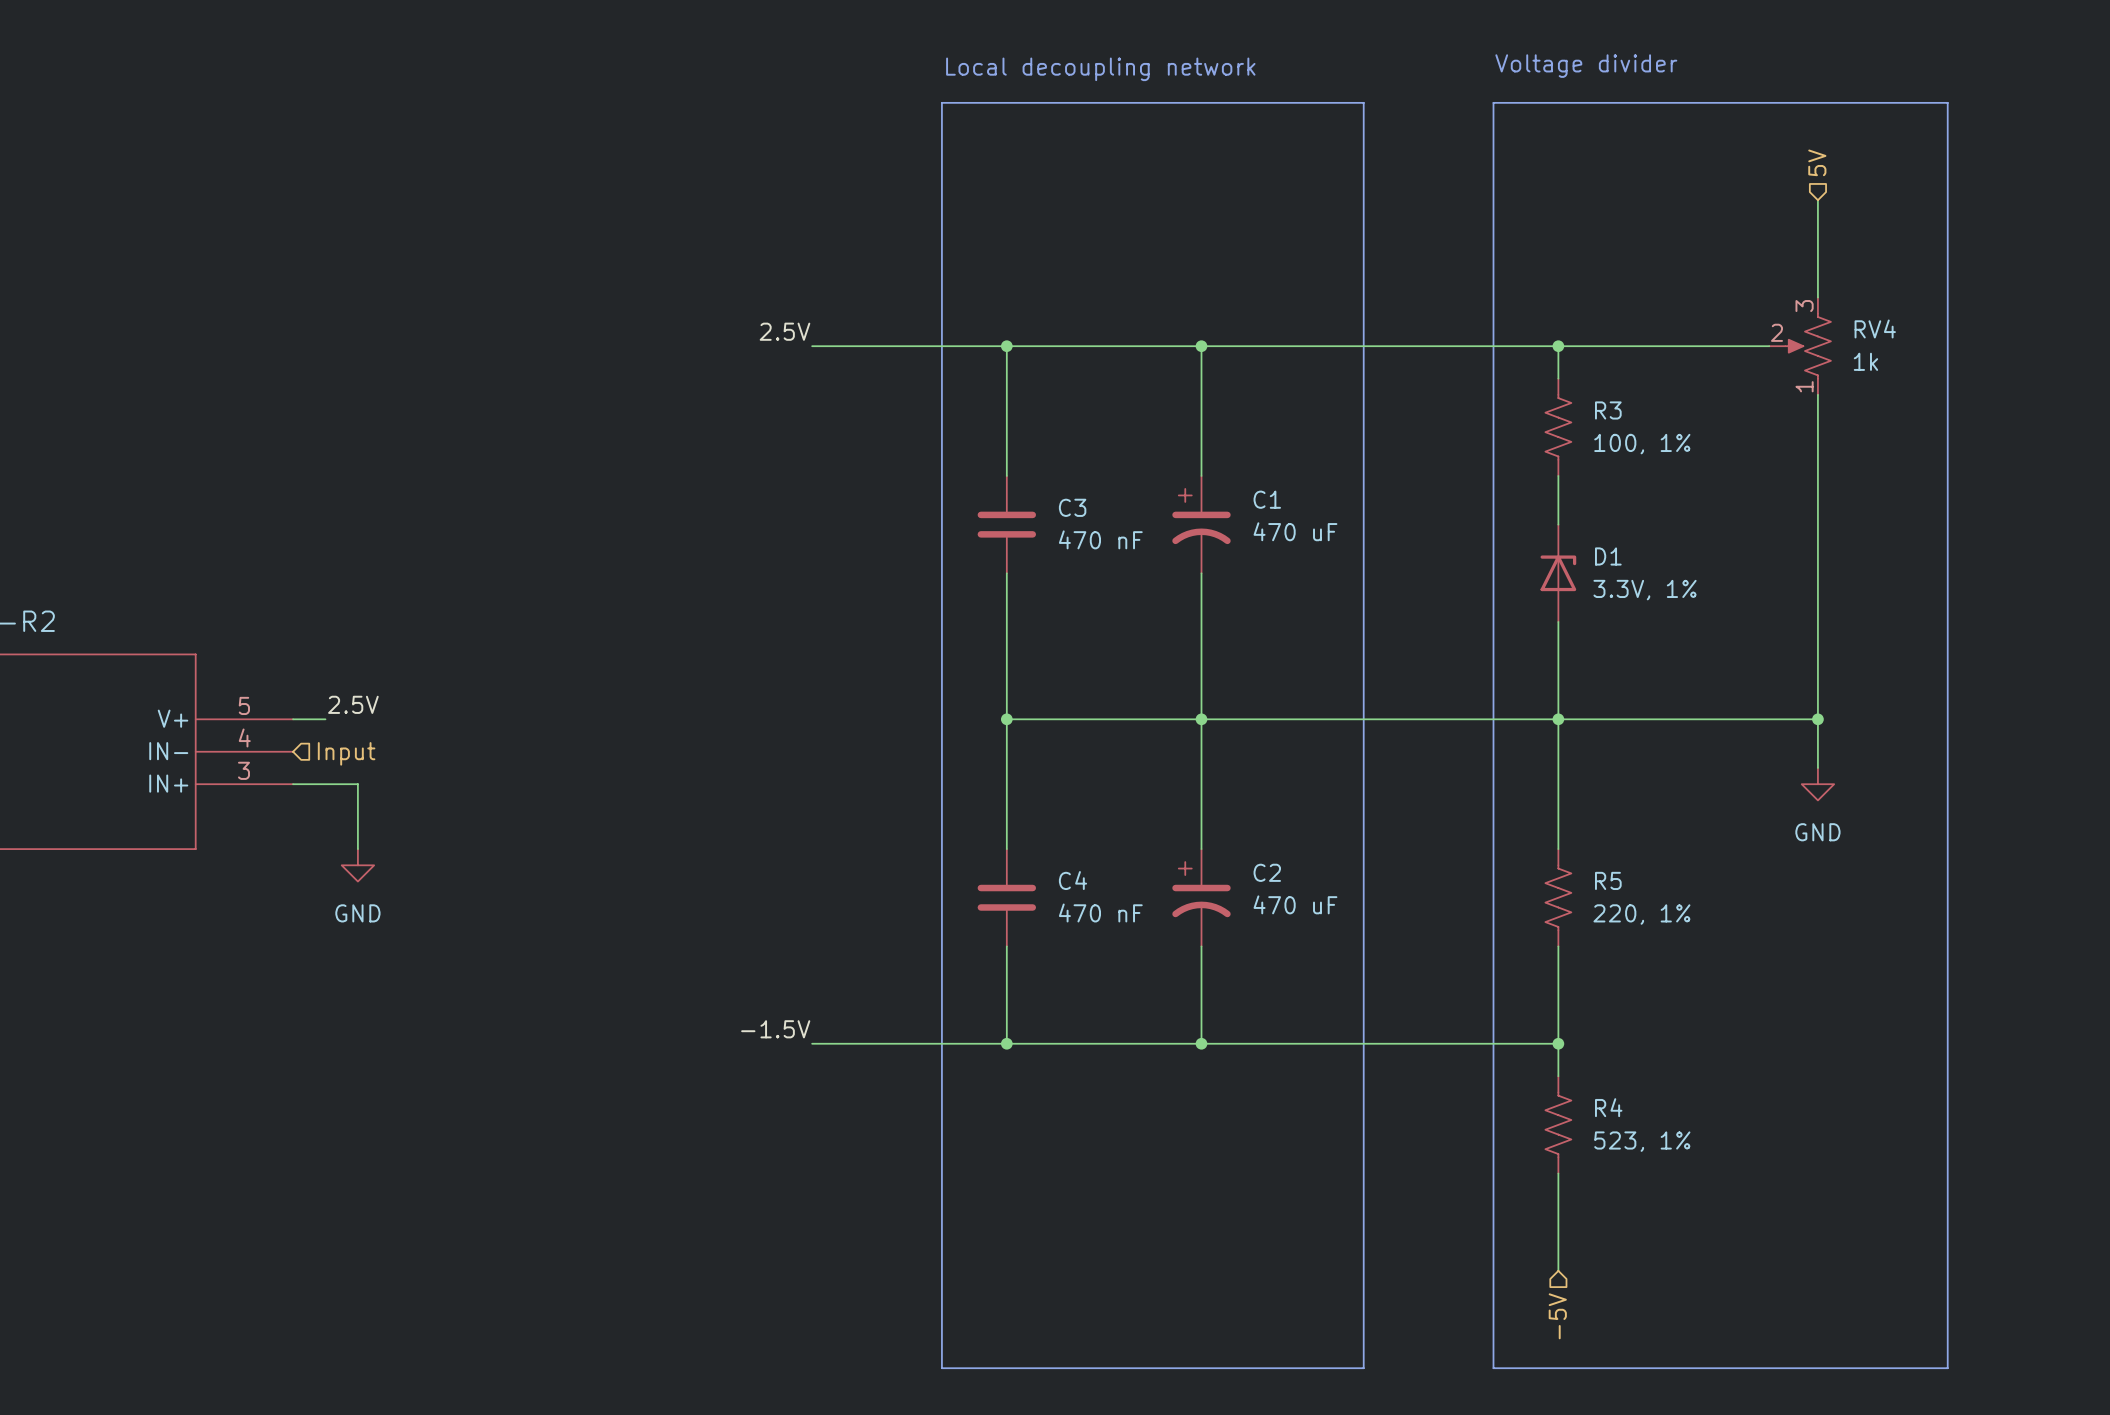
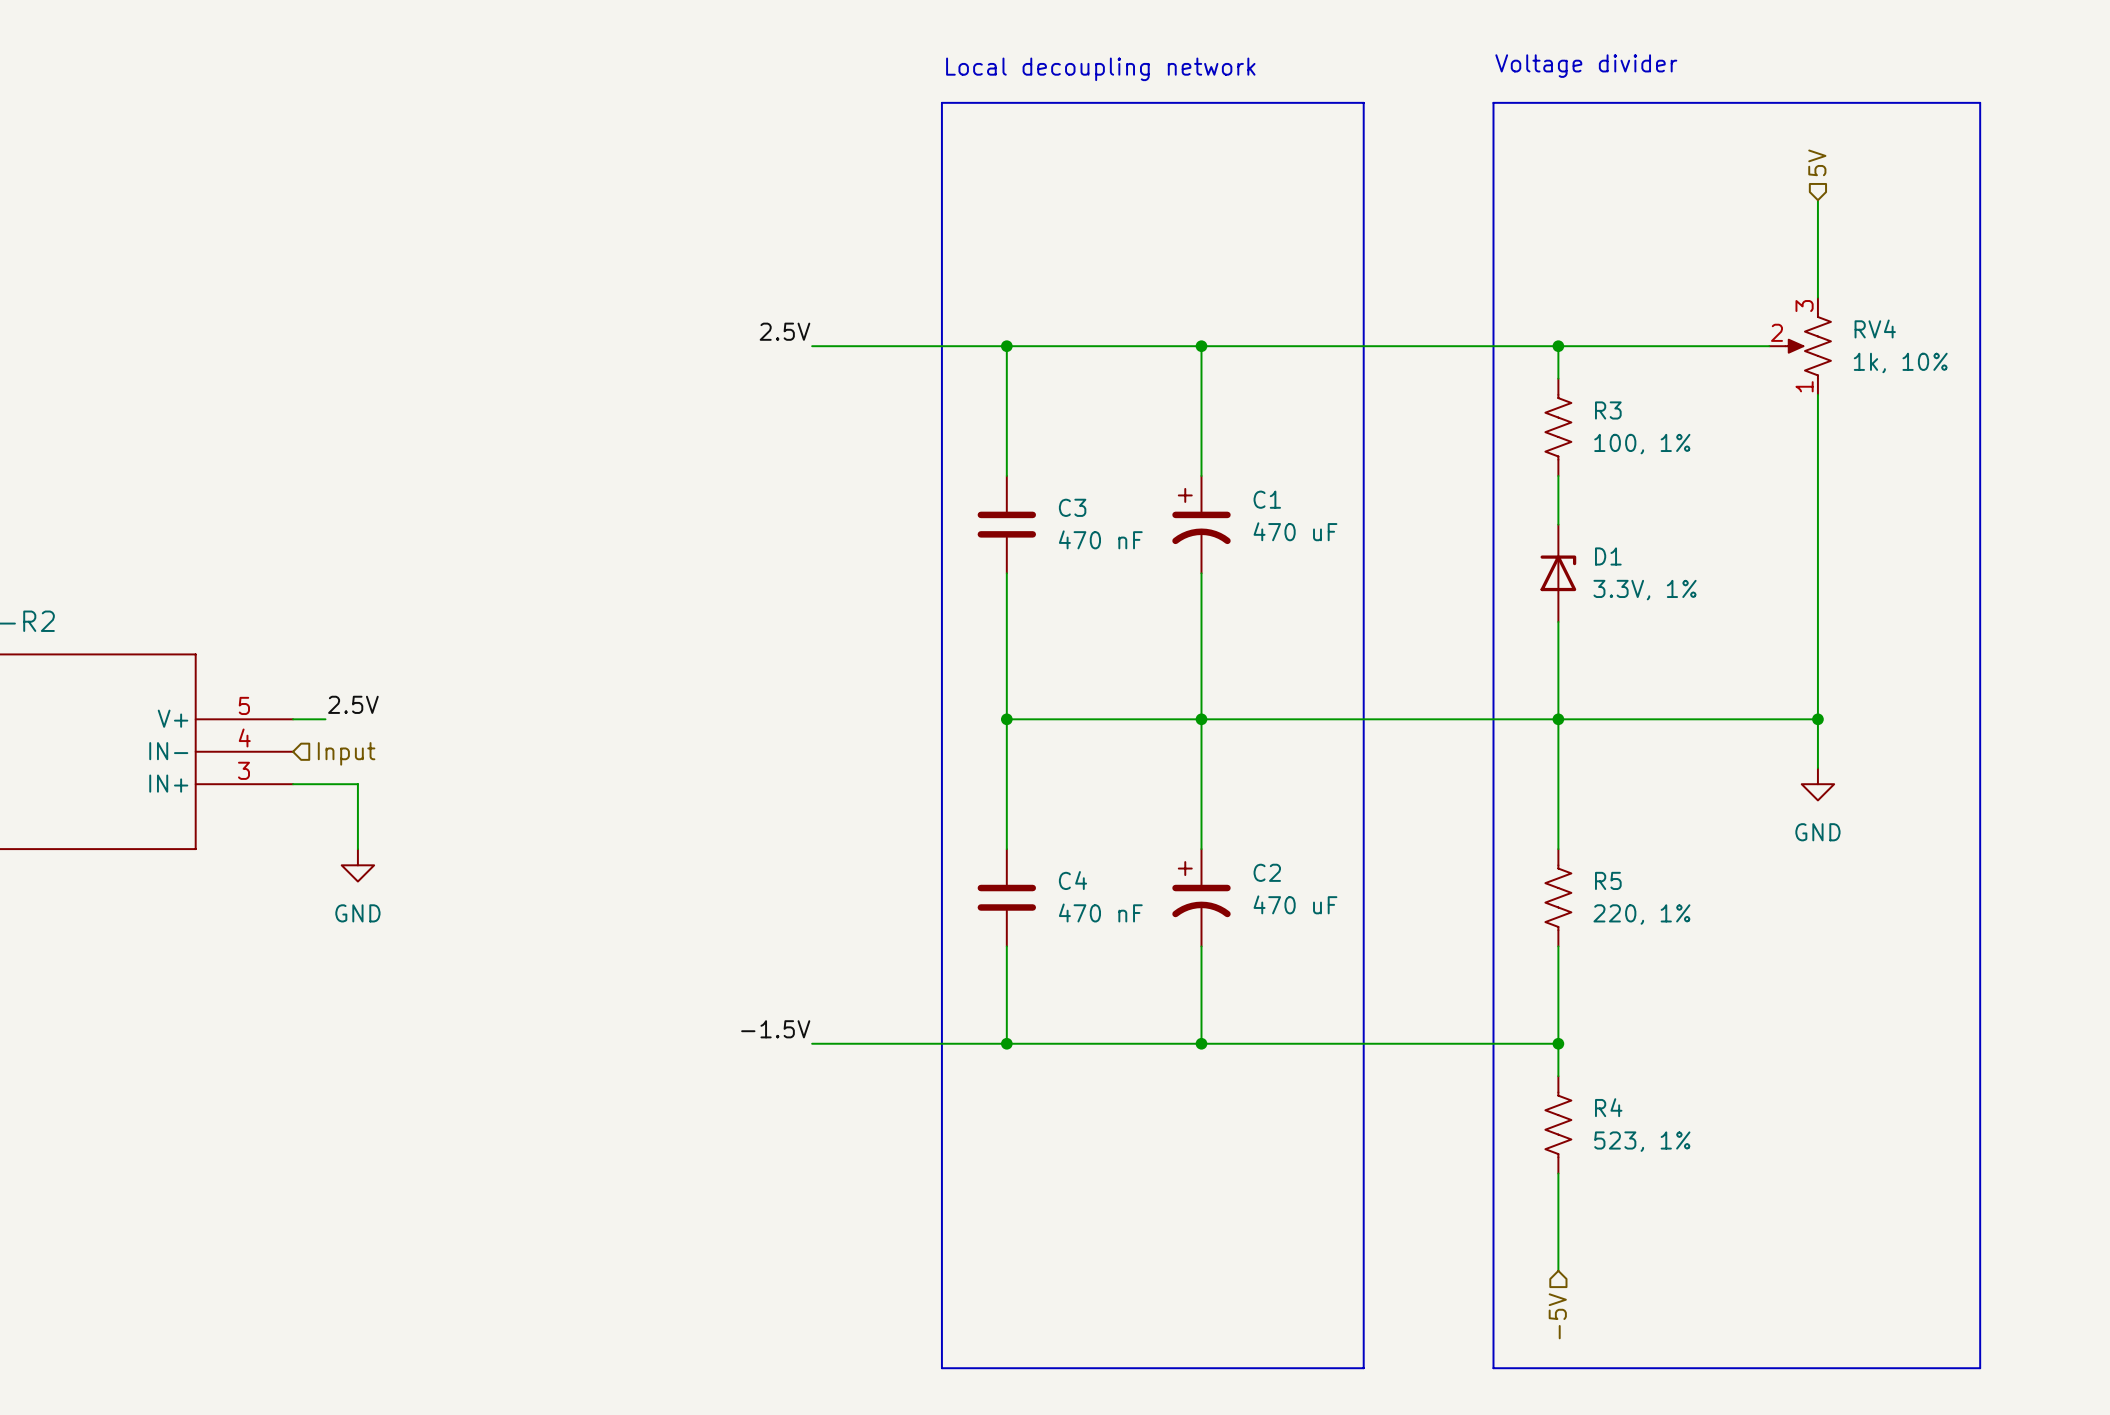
line: (1947, 102) (1947, 1368) -> (1947, 102) (1980, 102) (1980, 1368) (1947, 1368)
RV4 value: 1k (1865, 361) -> 1k, 10% (1900, 362)

